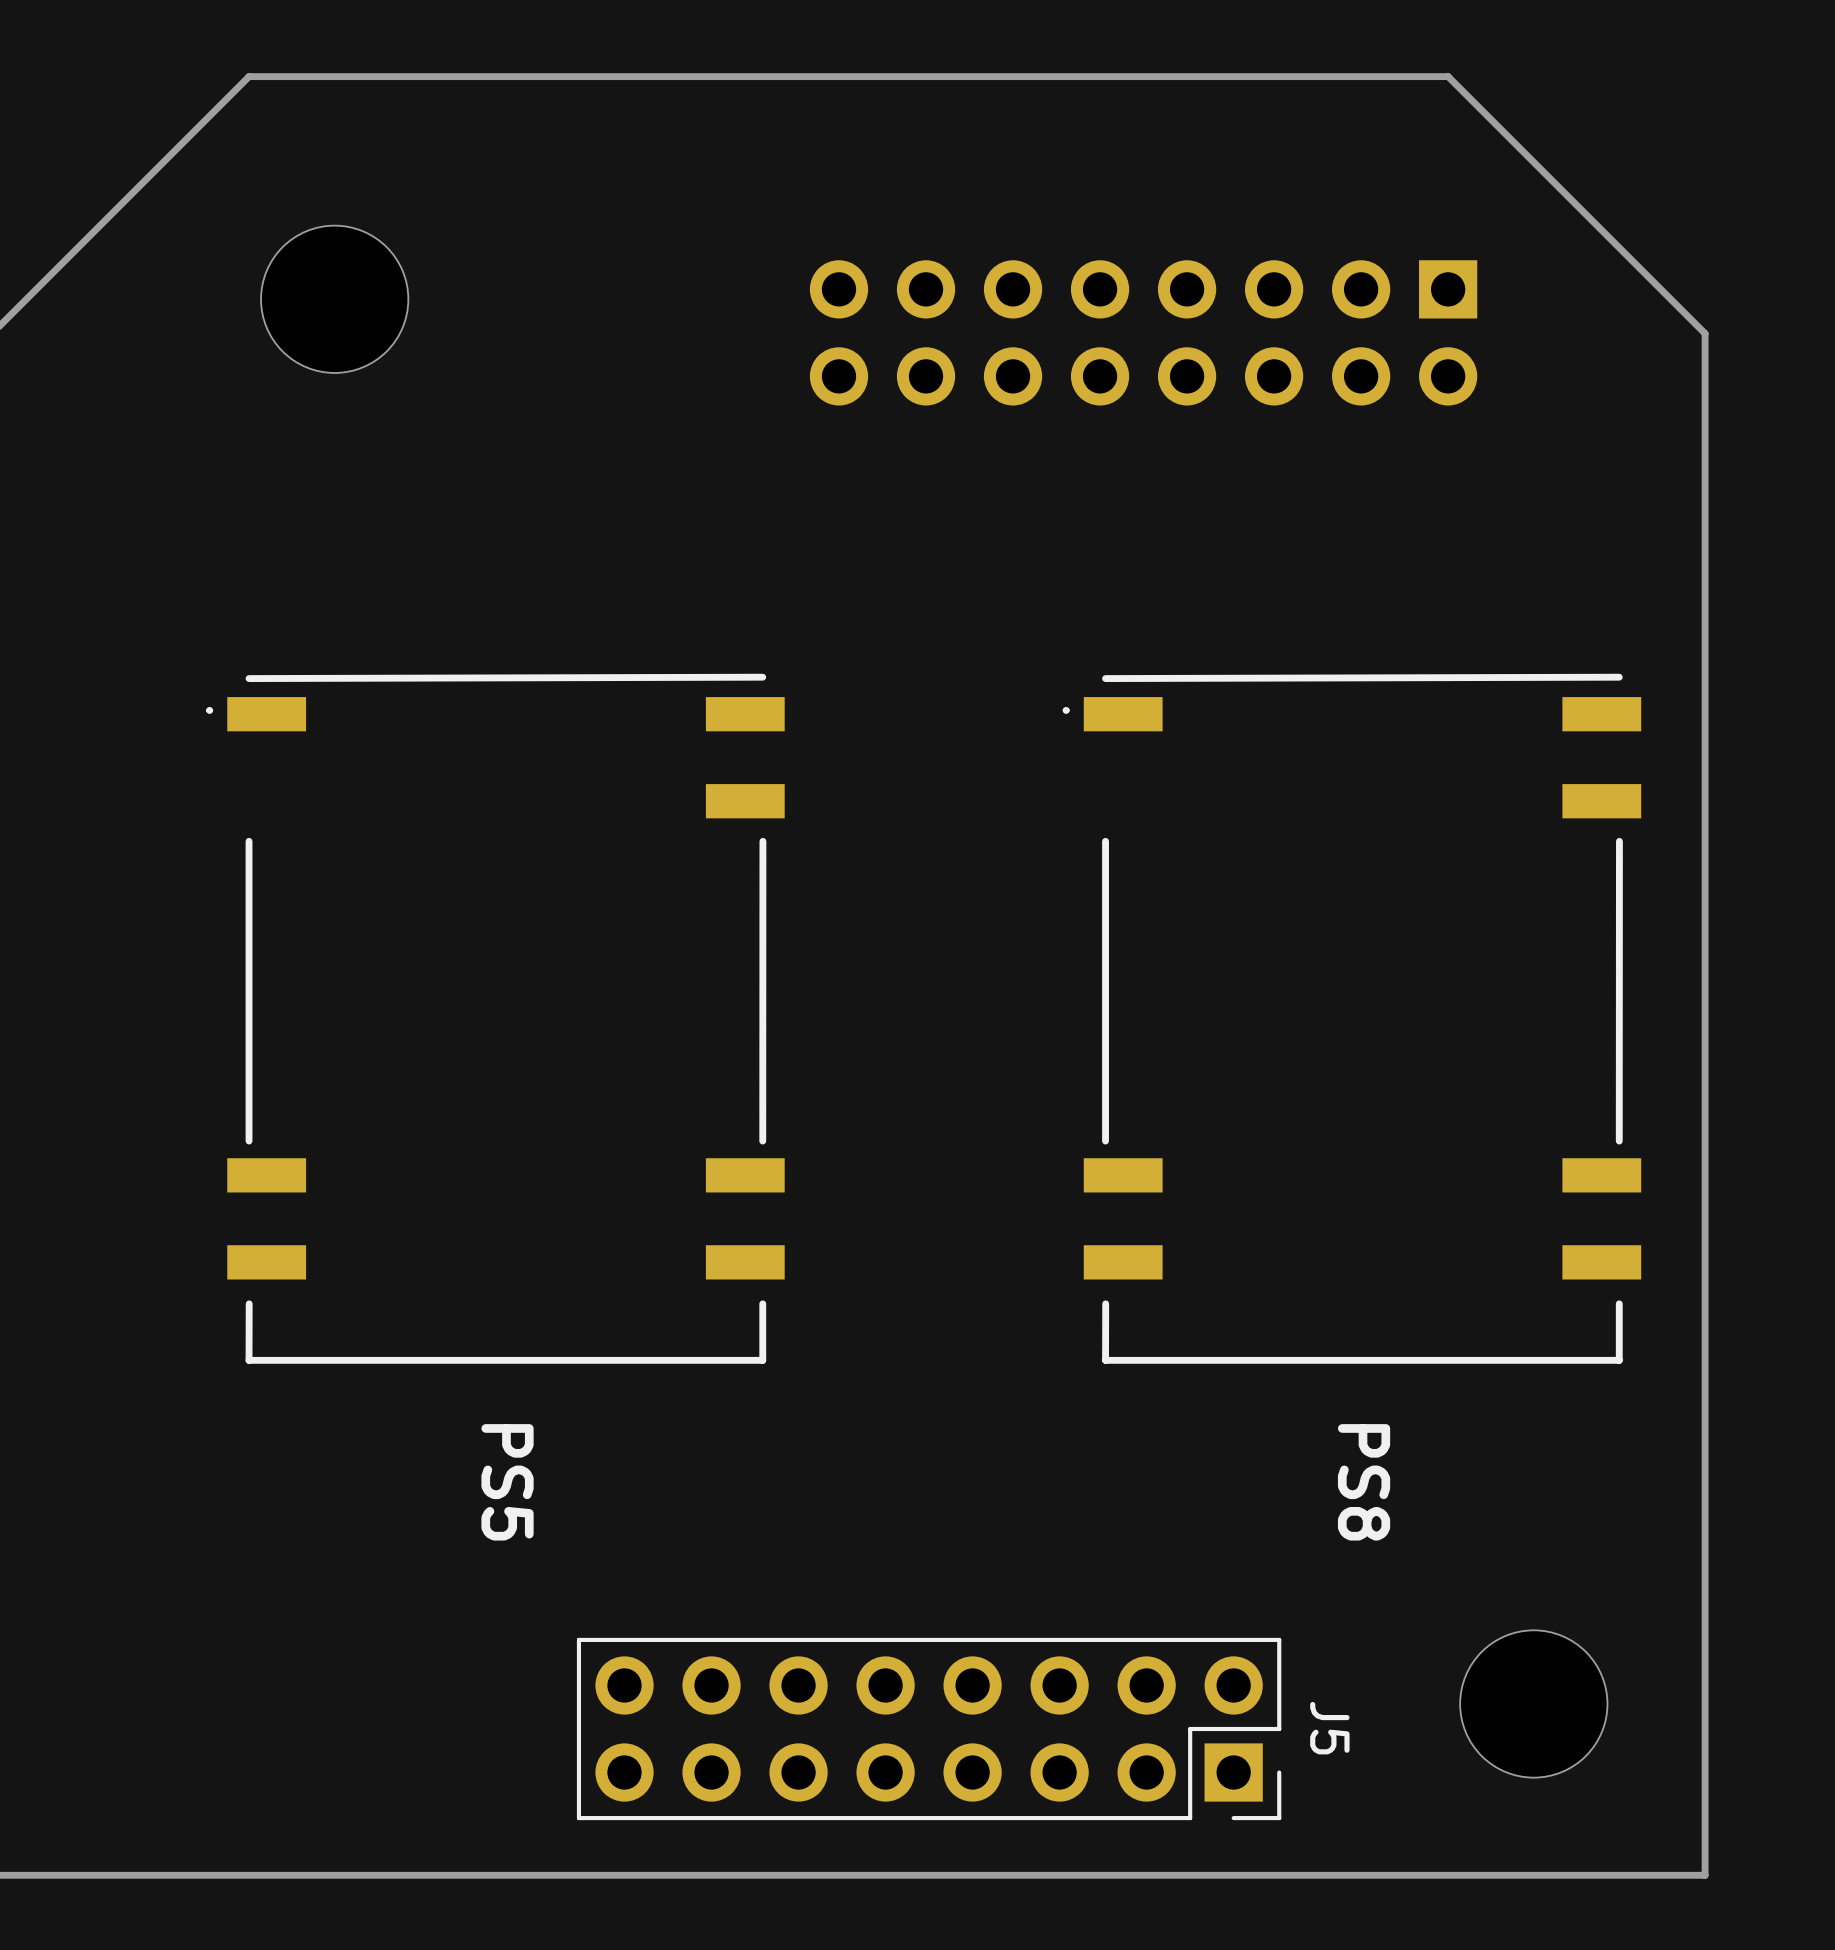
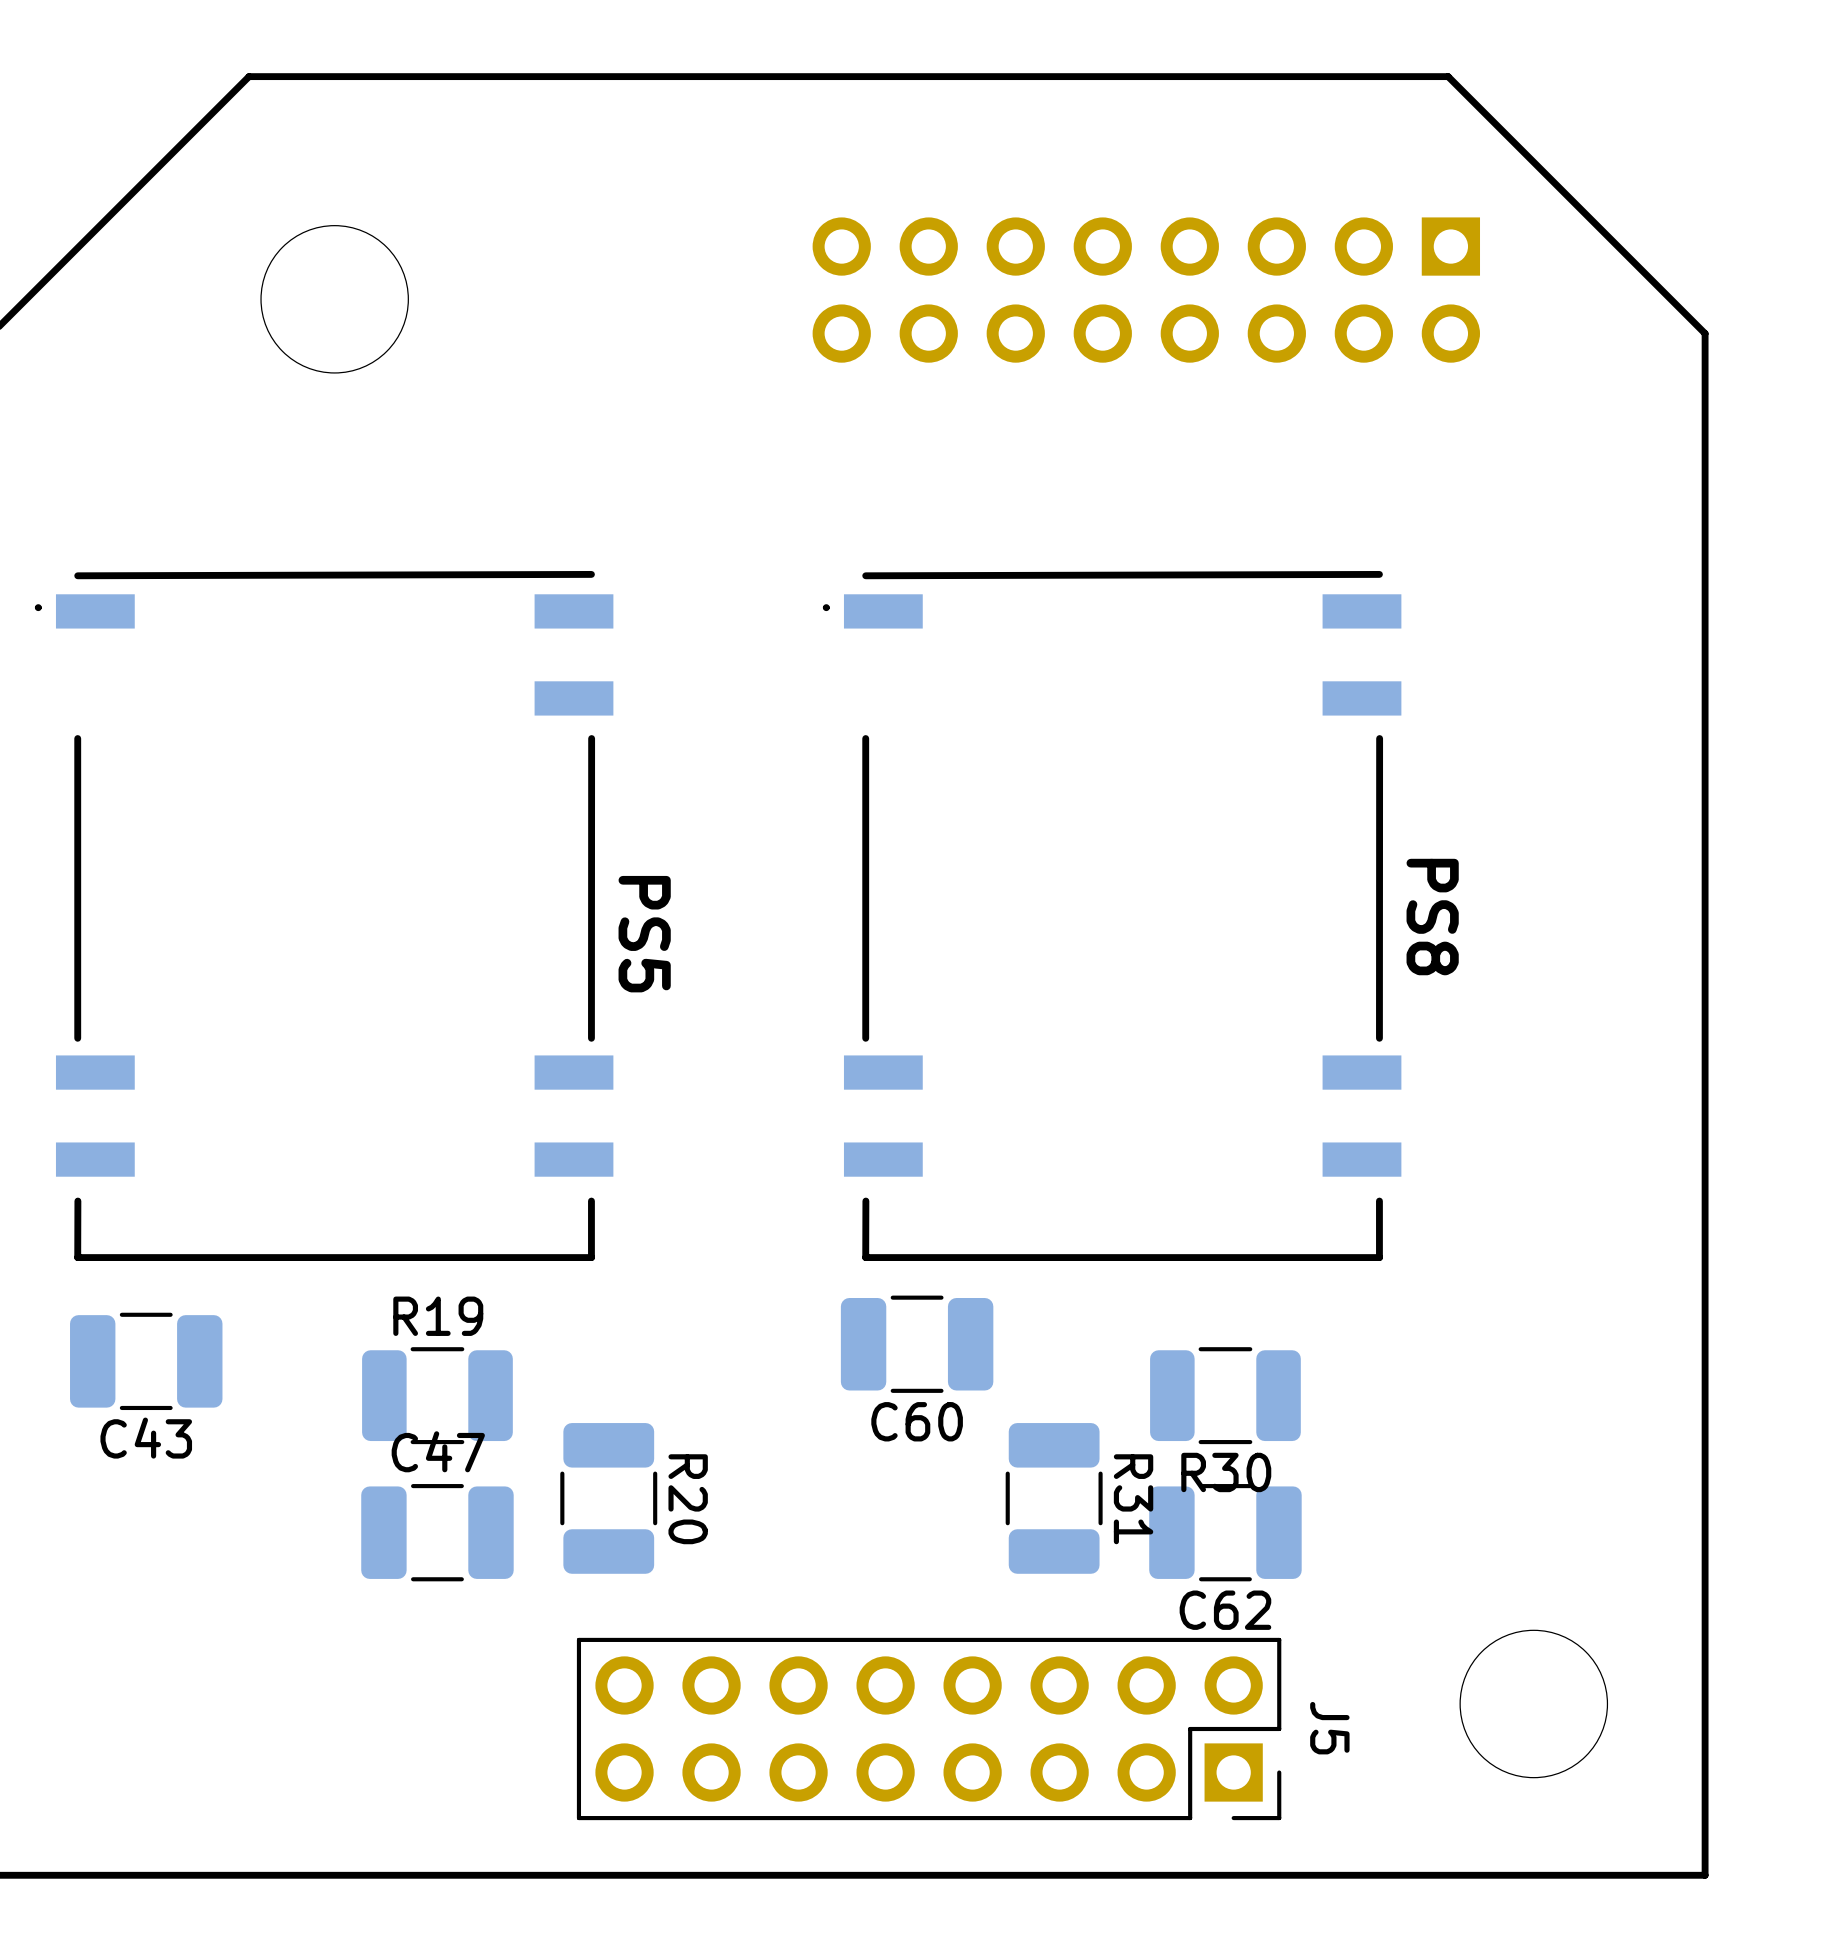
part position: (1143, 332) -> (1146, 290)
PS5 position: (495, 1018) -> (324, 915)
PS8 position: (1351, 1018) -> (1112, 915)
C60: none -> (917, 1344)
C43: none -> (146, 1361)
R19: none -> (437, 1395)
R30: none -> (1225, 1395)
PS5 name position: PS5 (507, 1482) -> PS5 (644, 934)
PS8 name position: PS8 (1364, 1482) -> PS8 (1432, 917)
R20: none -> (608, 1498)
R31: none -> (1054, 1498)
C47: none -> (437, 1532)
C62: none -> (1225, 1532)

